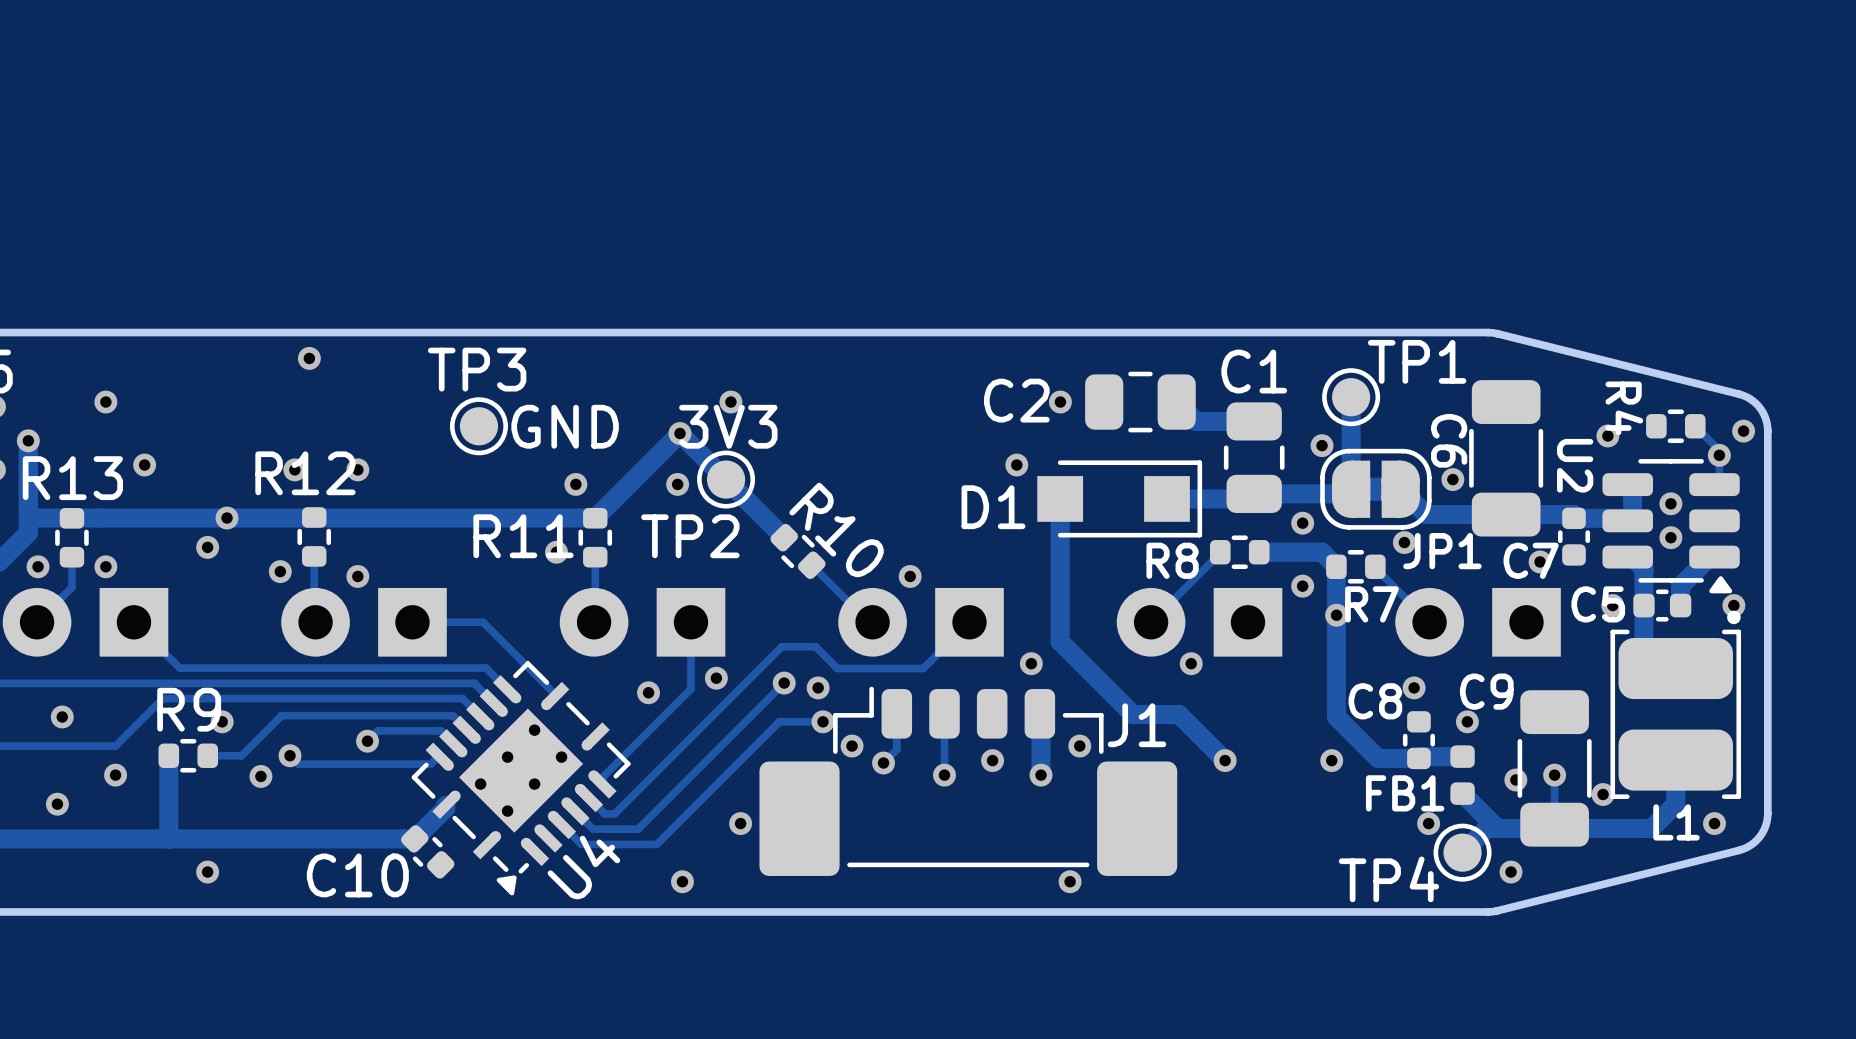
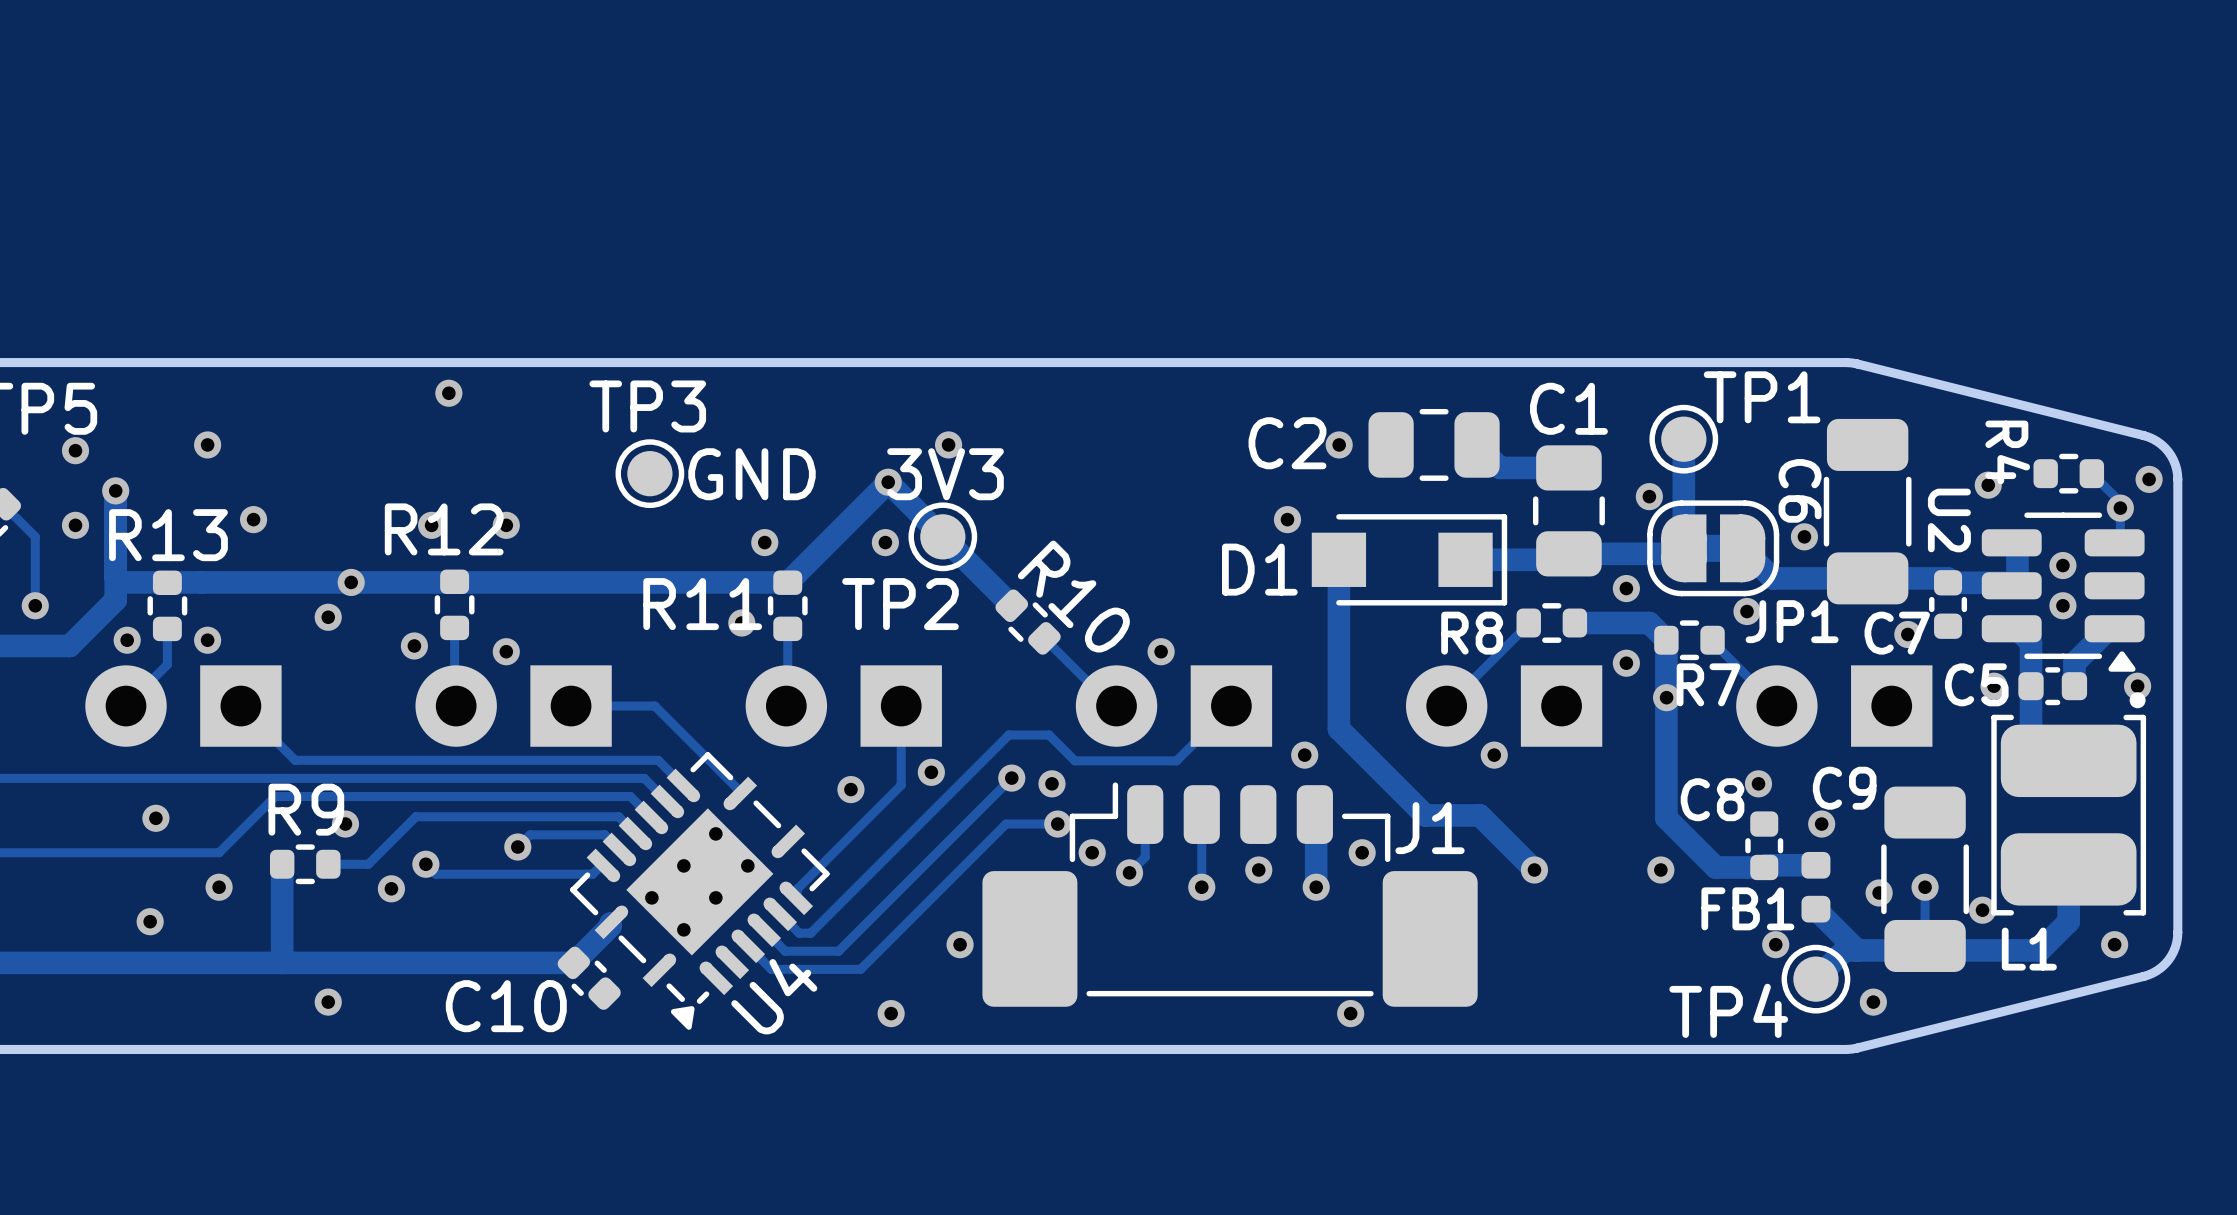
L1 name position: L1 (1676, 822) -> L1 (2029, 949)

